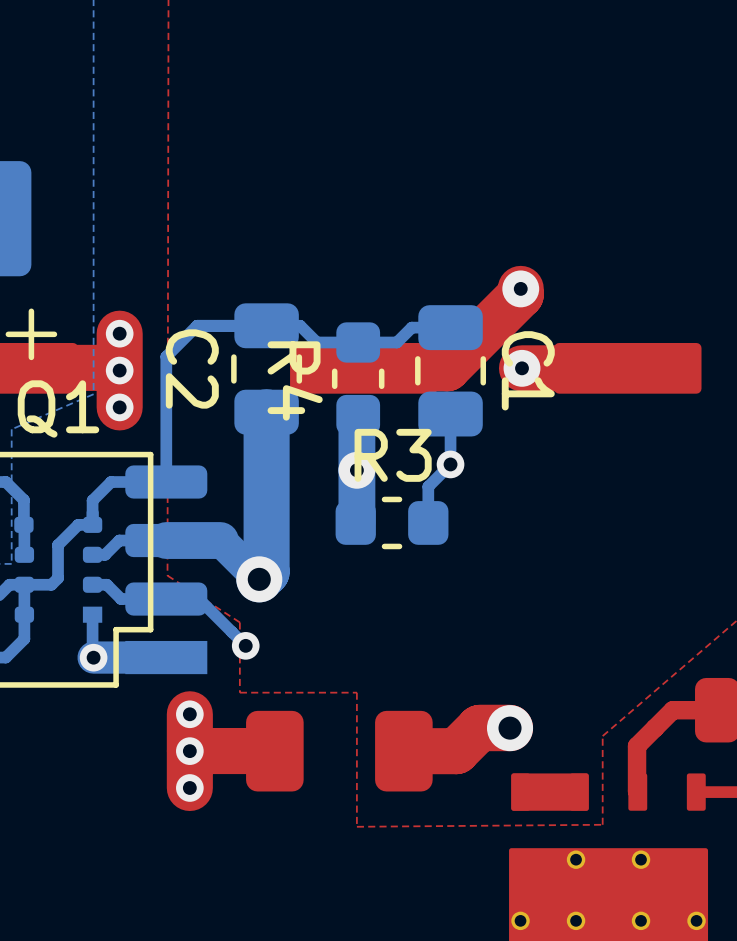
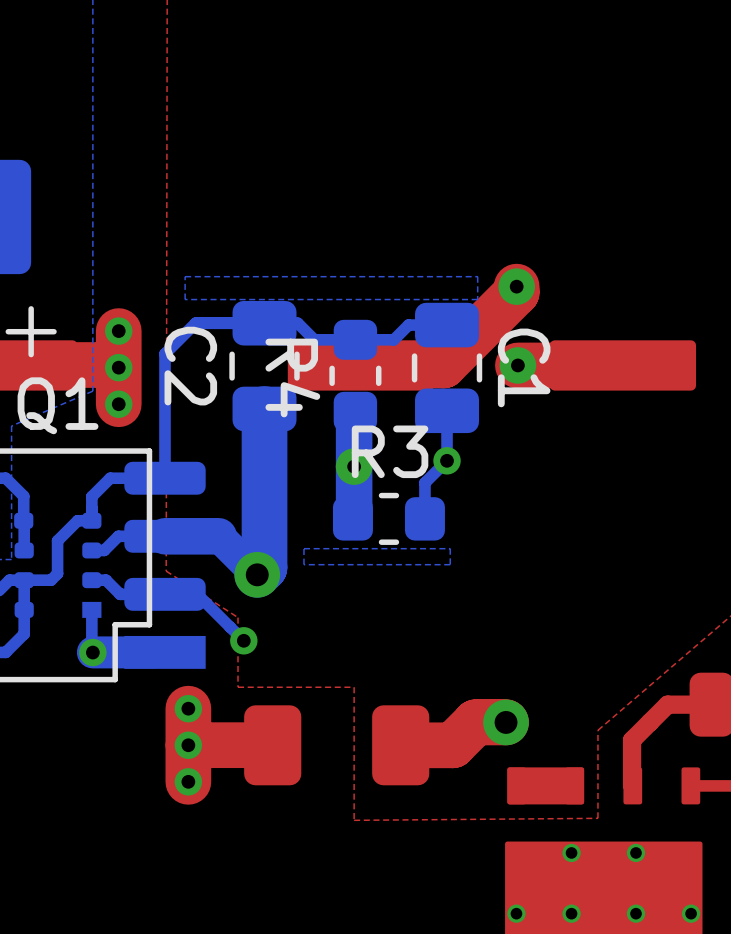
bottom zone outline: none -> (477, 276) (477, 299) (185, 299) (185, 276) (477, 276)
bottom zone outline: none -> (450, 548) (450, 564) (303, 564) (303, 548) (450, 548)

